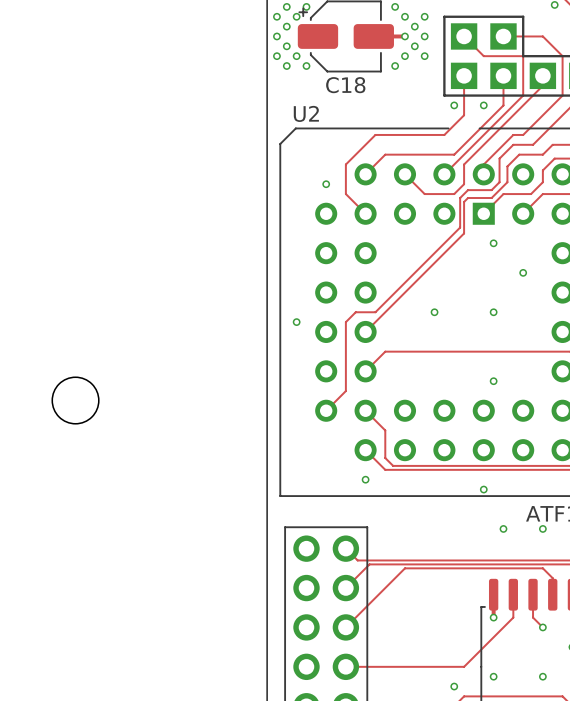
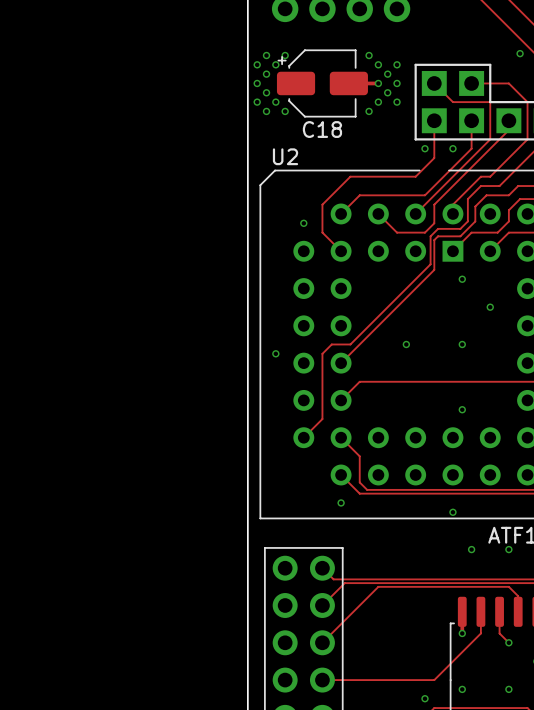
round board edge: [51, 376, 100, 425] -> none

